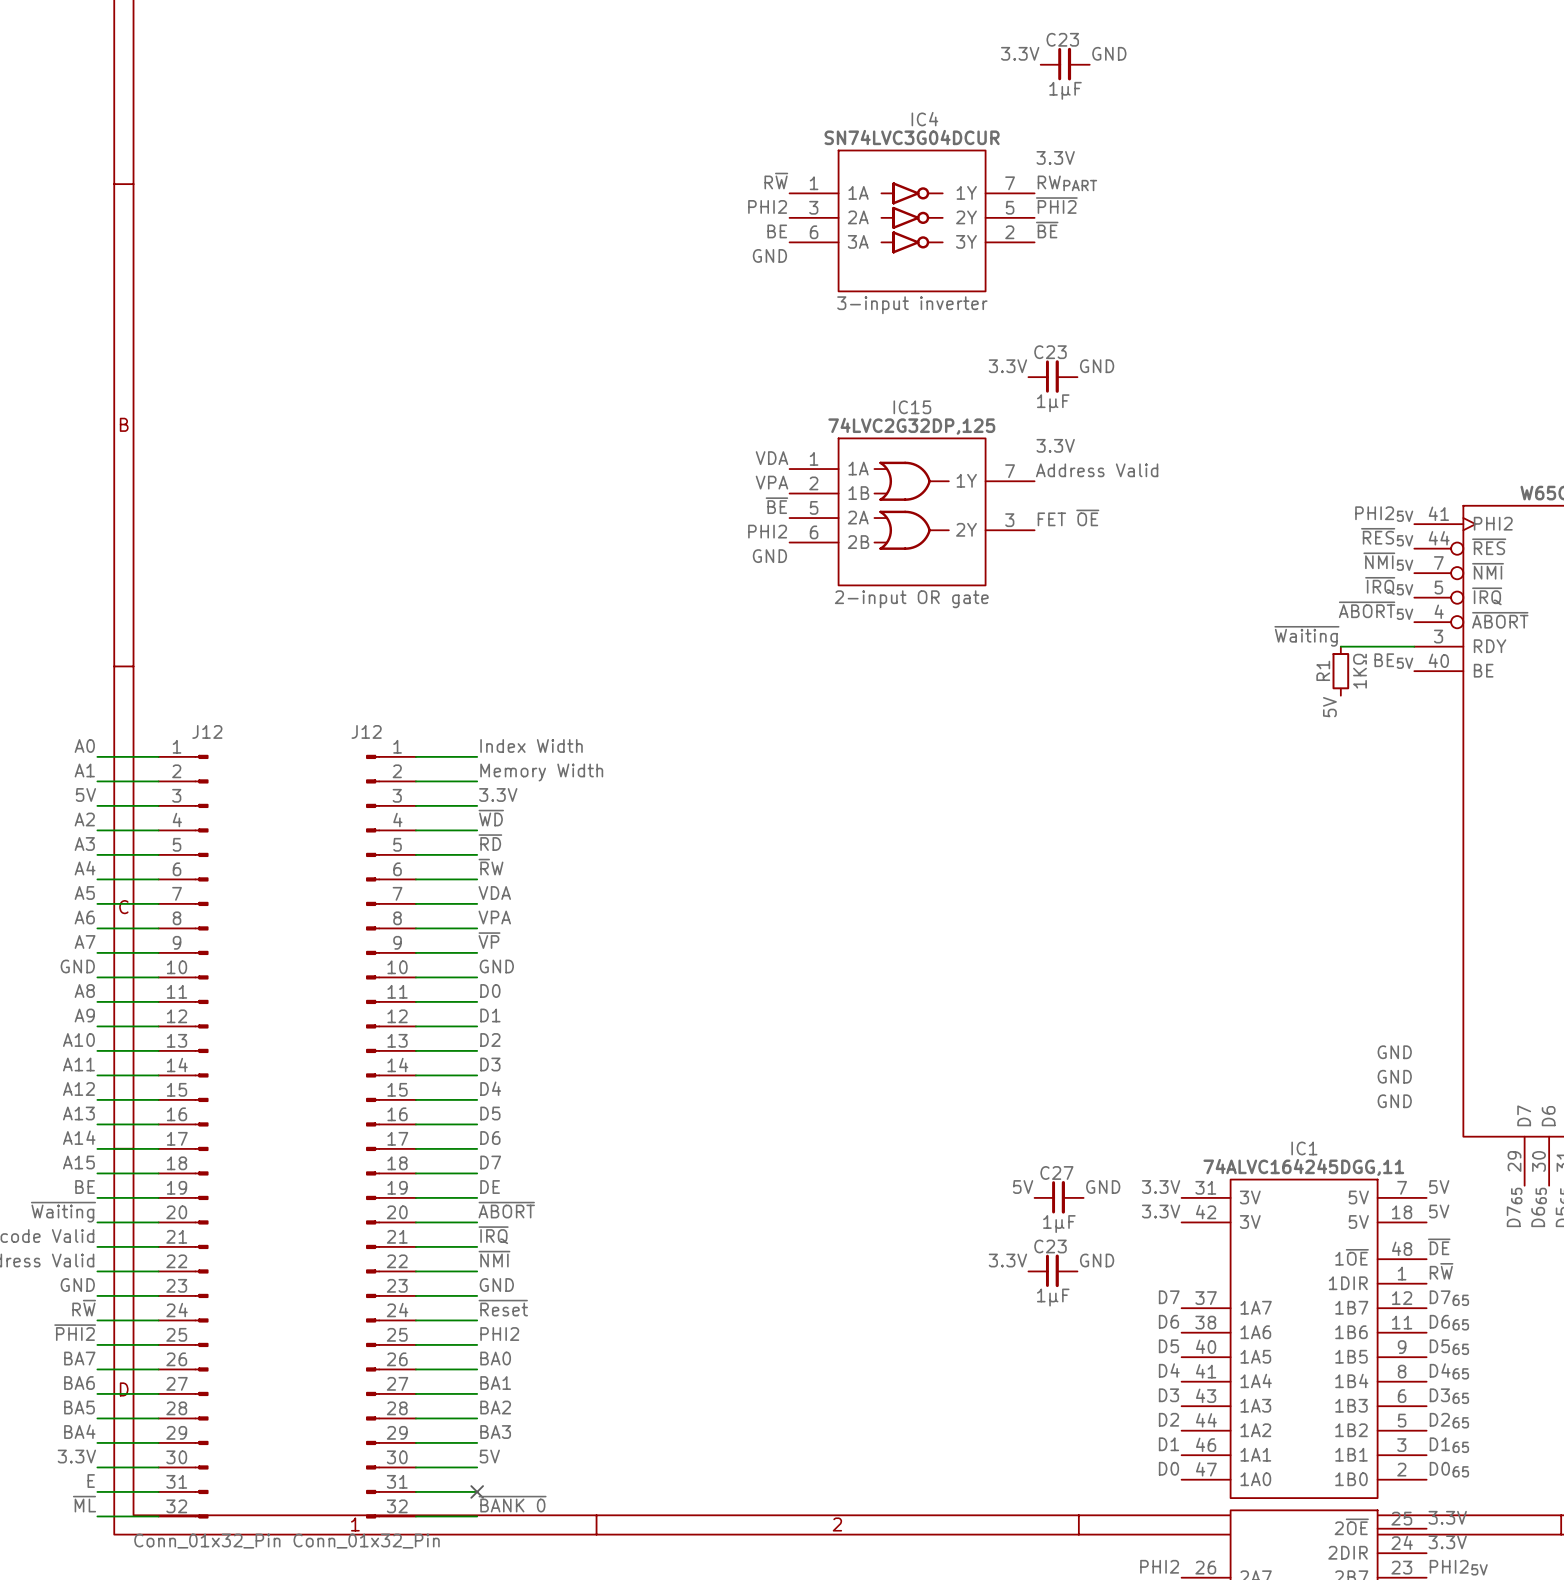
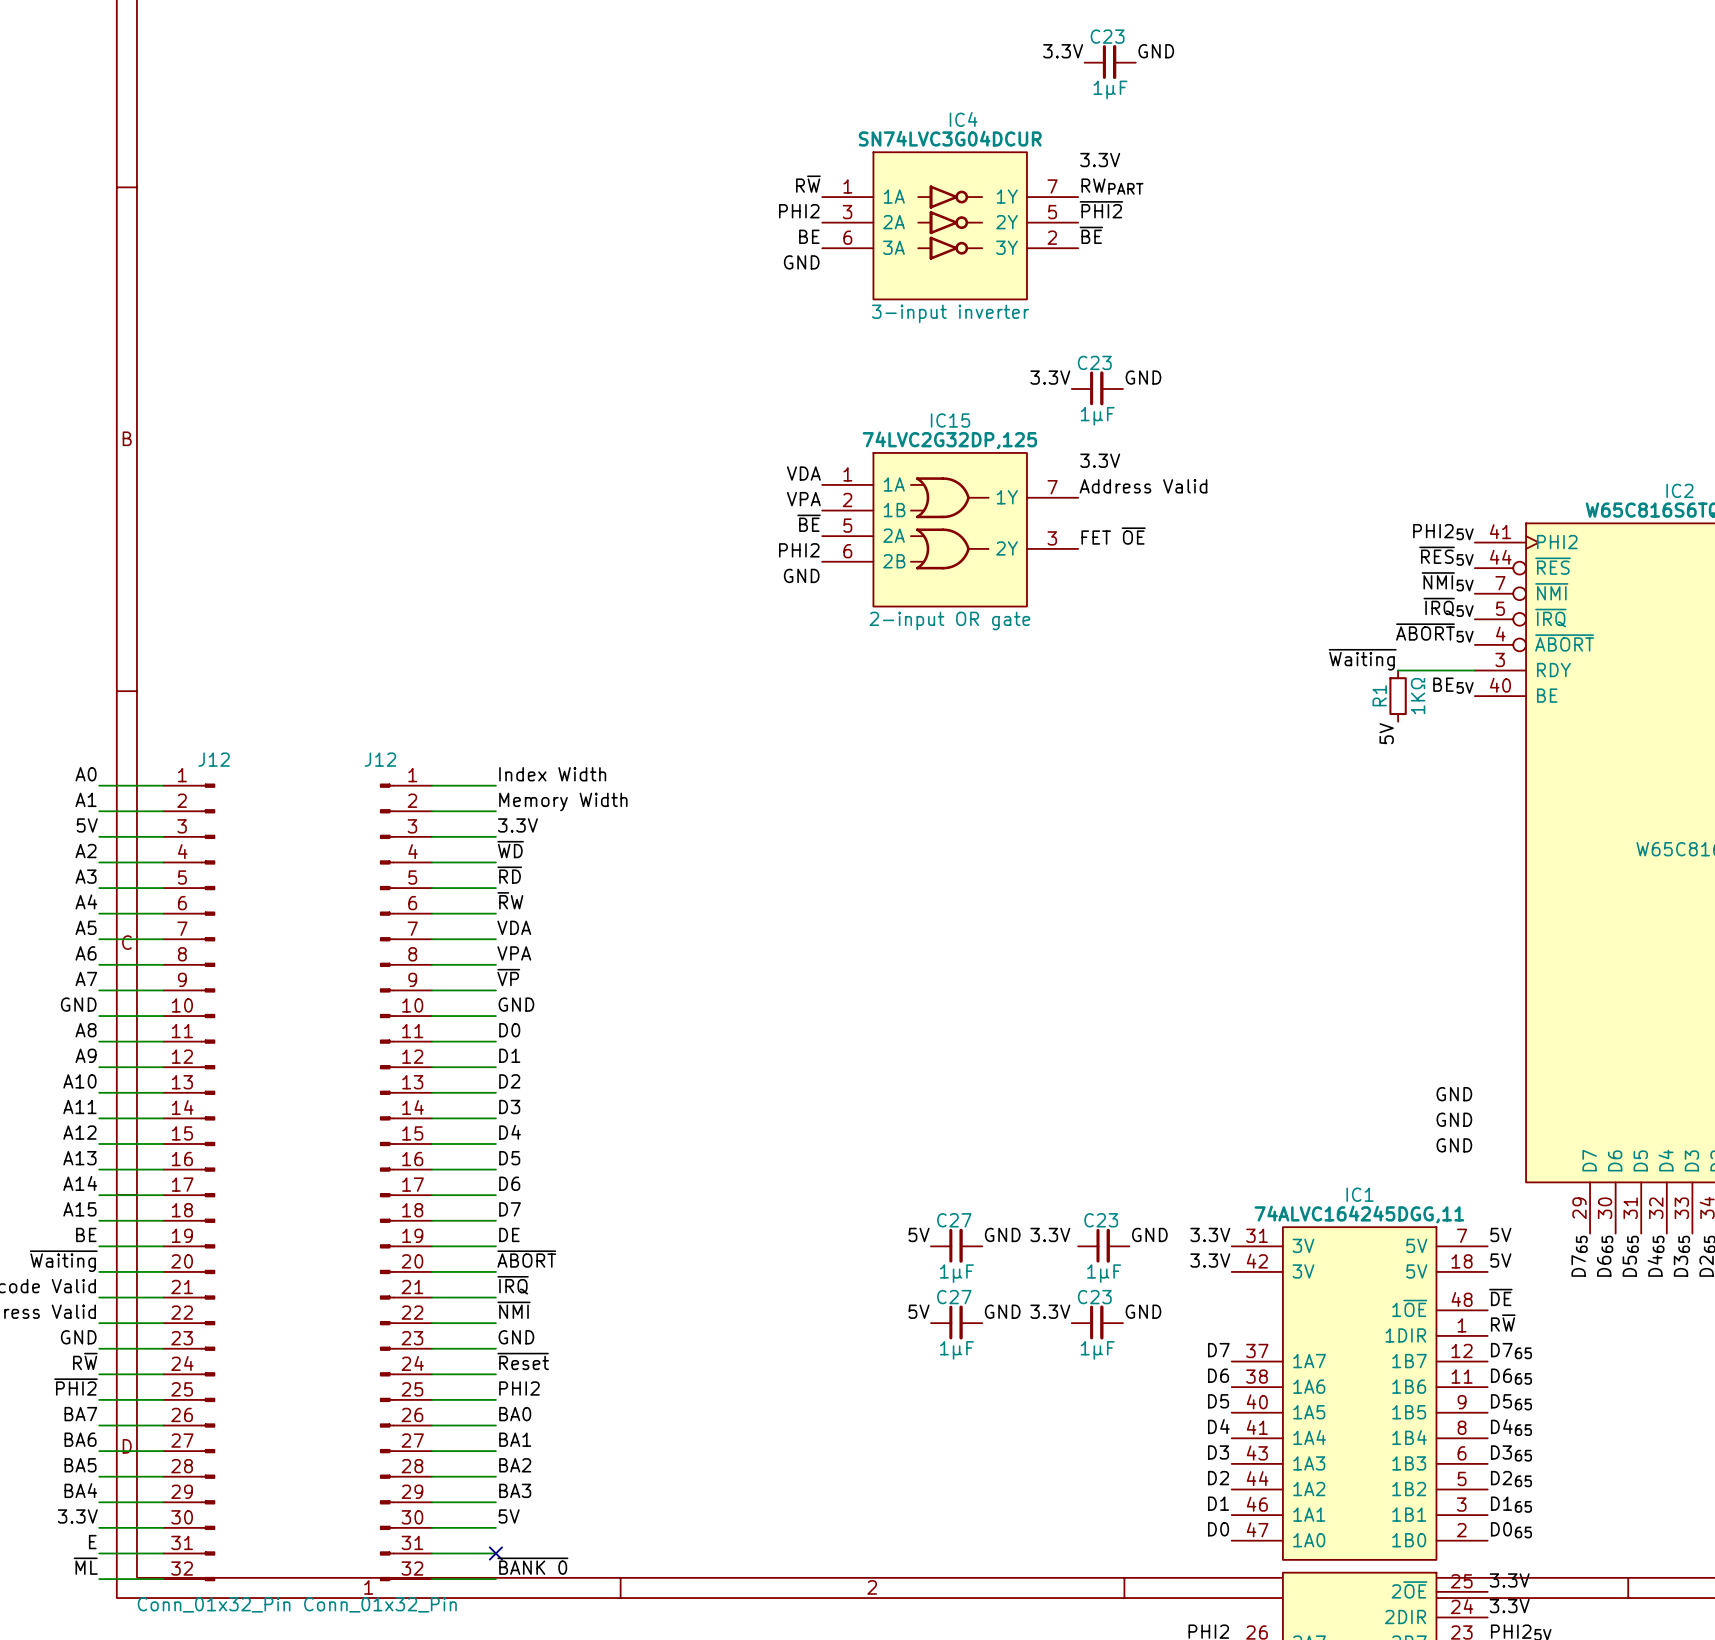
C27 name: C27 (1056, 1172) -> C23 (1101, 1220)
label: none -> 5V (919, 1234)
label: none -> GND (1002, 1234)
label: 5V (1023, 1187) -> 3.3V (1050, 1234)
C27: none -> (956, 1245)
label: none -> 5V (919, 1311)
label: none -> GND (1002, 1311)
C27: none -> (956, 1322)

